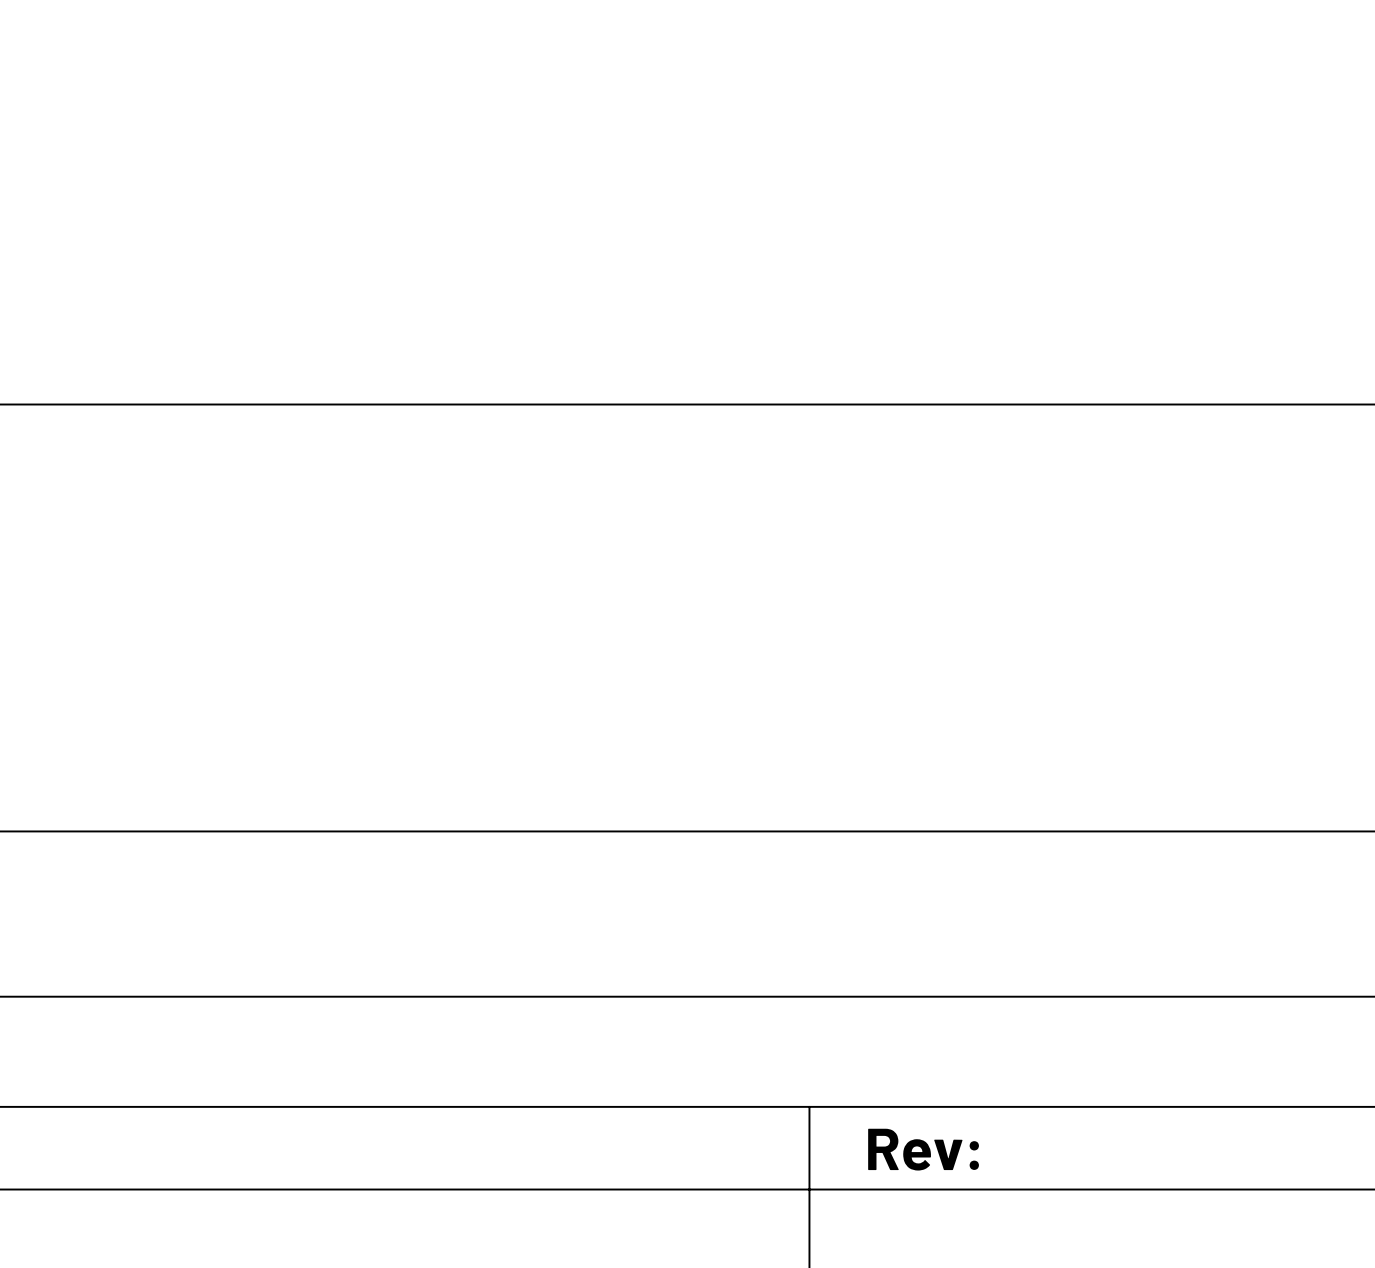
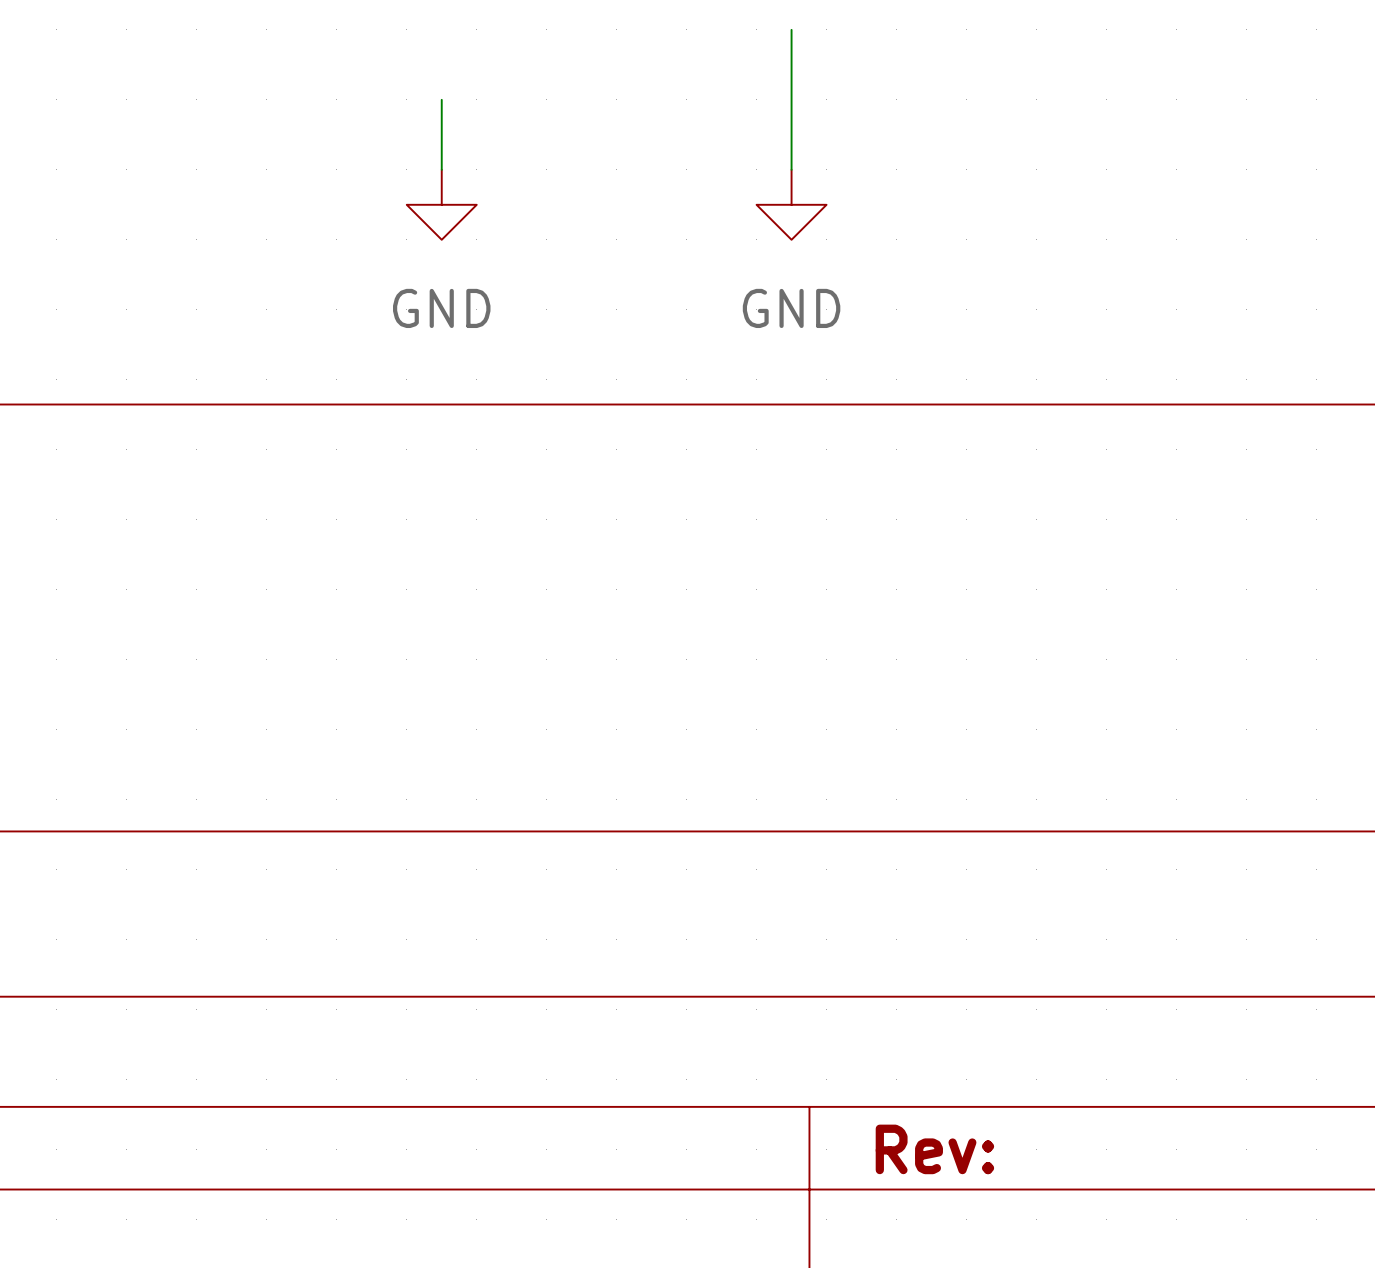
wire: none -> (791, 29) (791, 169)
wire: none -> (441, 99) (441, 169)
power symbol: none -> GND (441, 204)
power symbol: none -> GND (791, 204)

